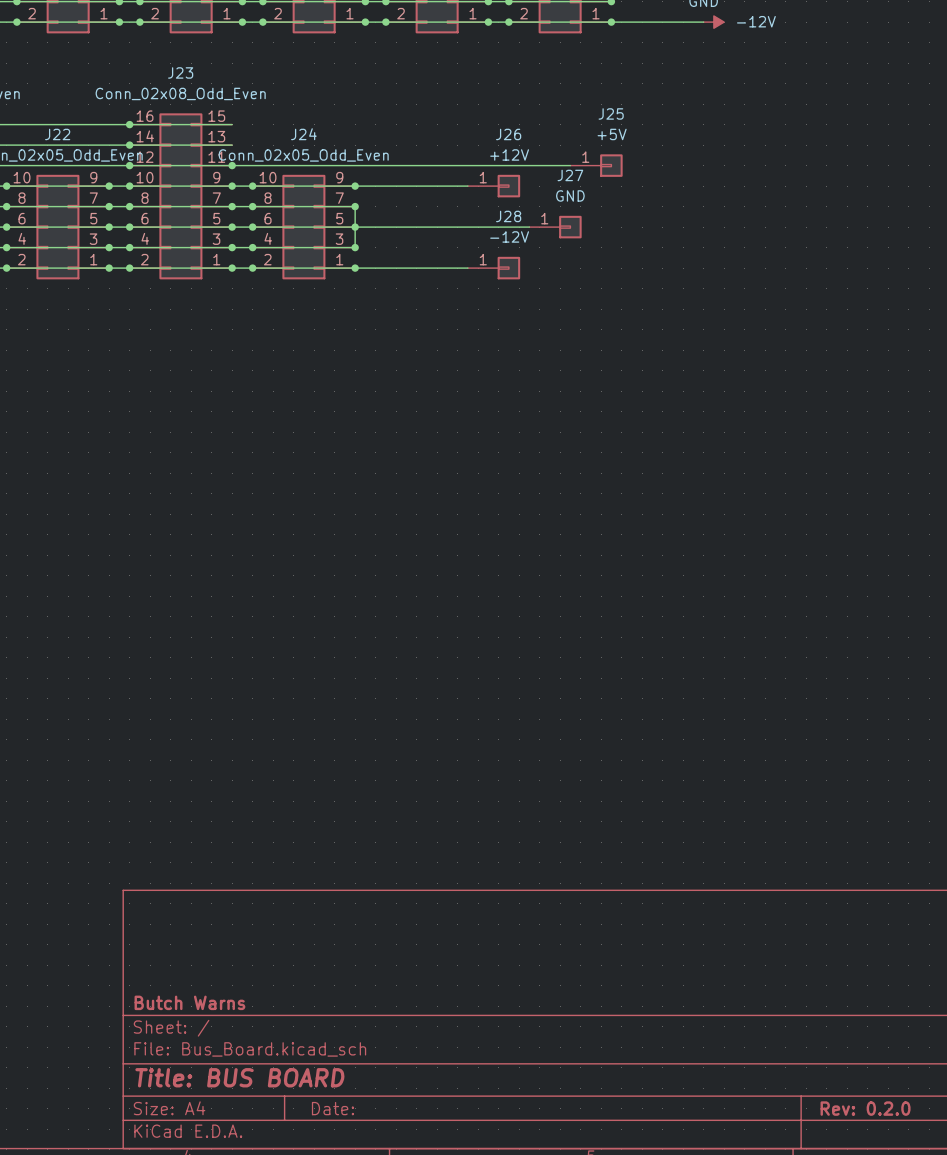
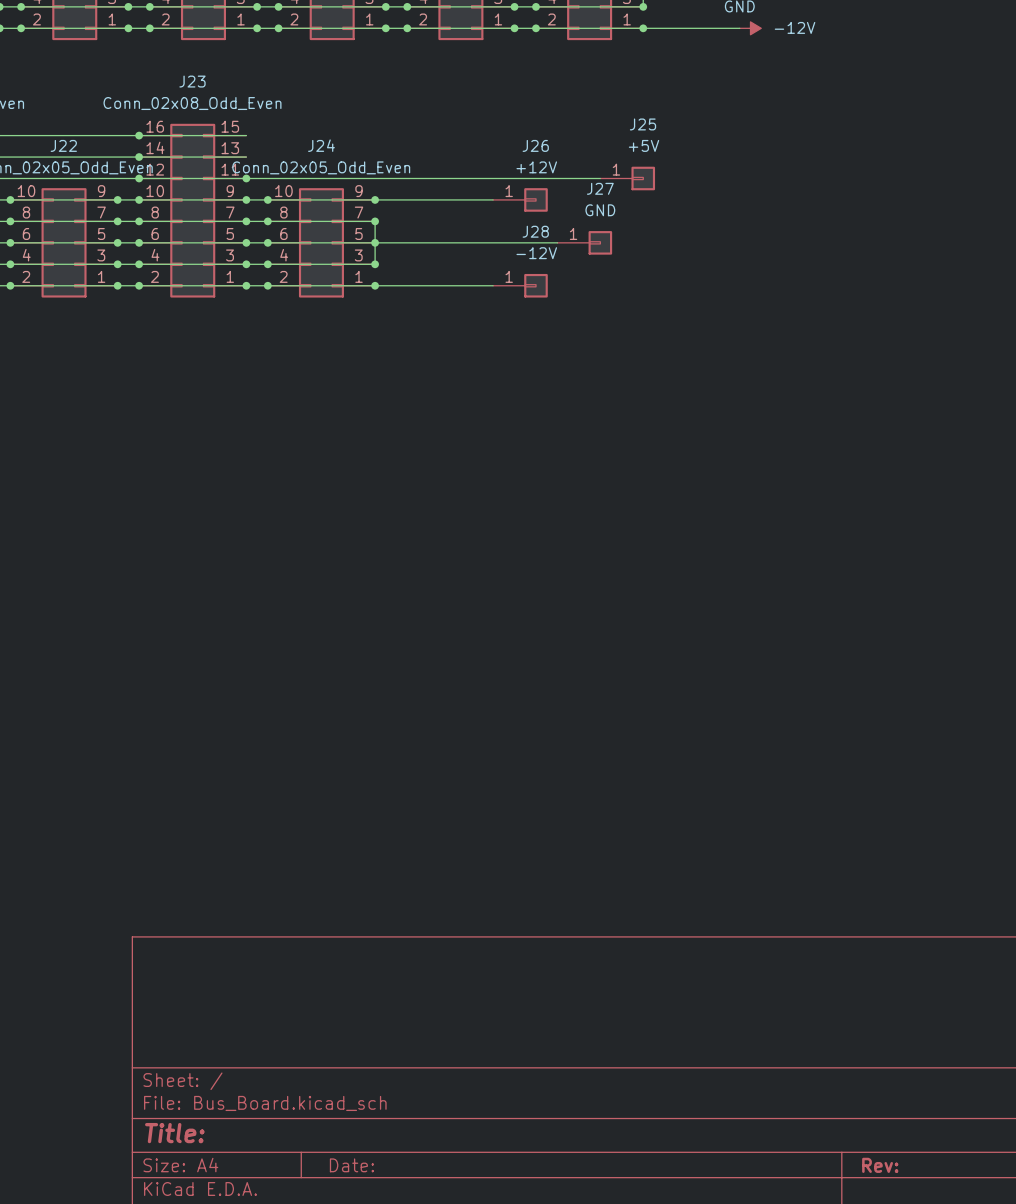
title block: Butch Warns (189, 1002) -> none
title block: Title: BUS BOARD (239, 1077) -> Title: (174, 1133)
title block: Rev: 0.2.0 (865, 1108) -> Rev: (880, 1165)

